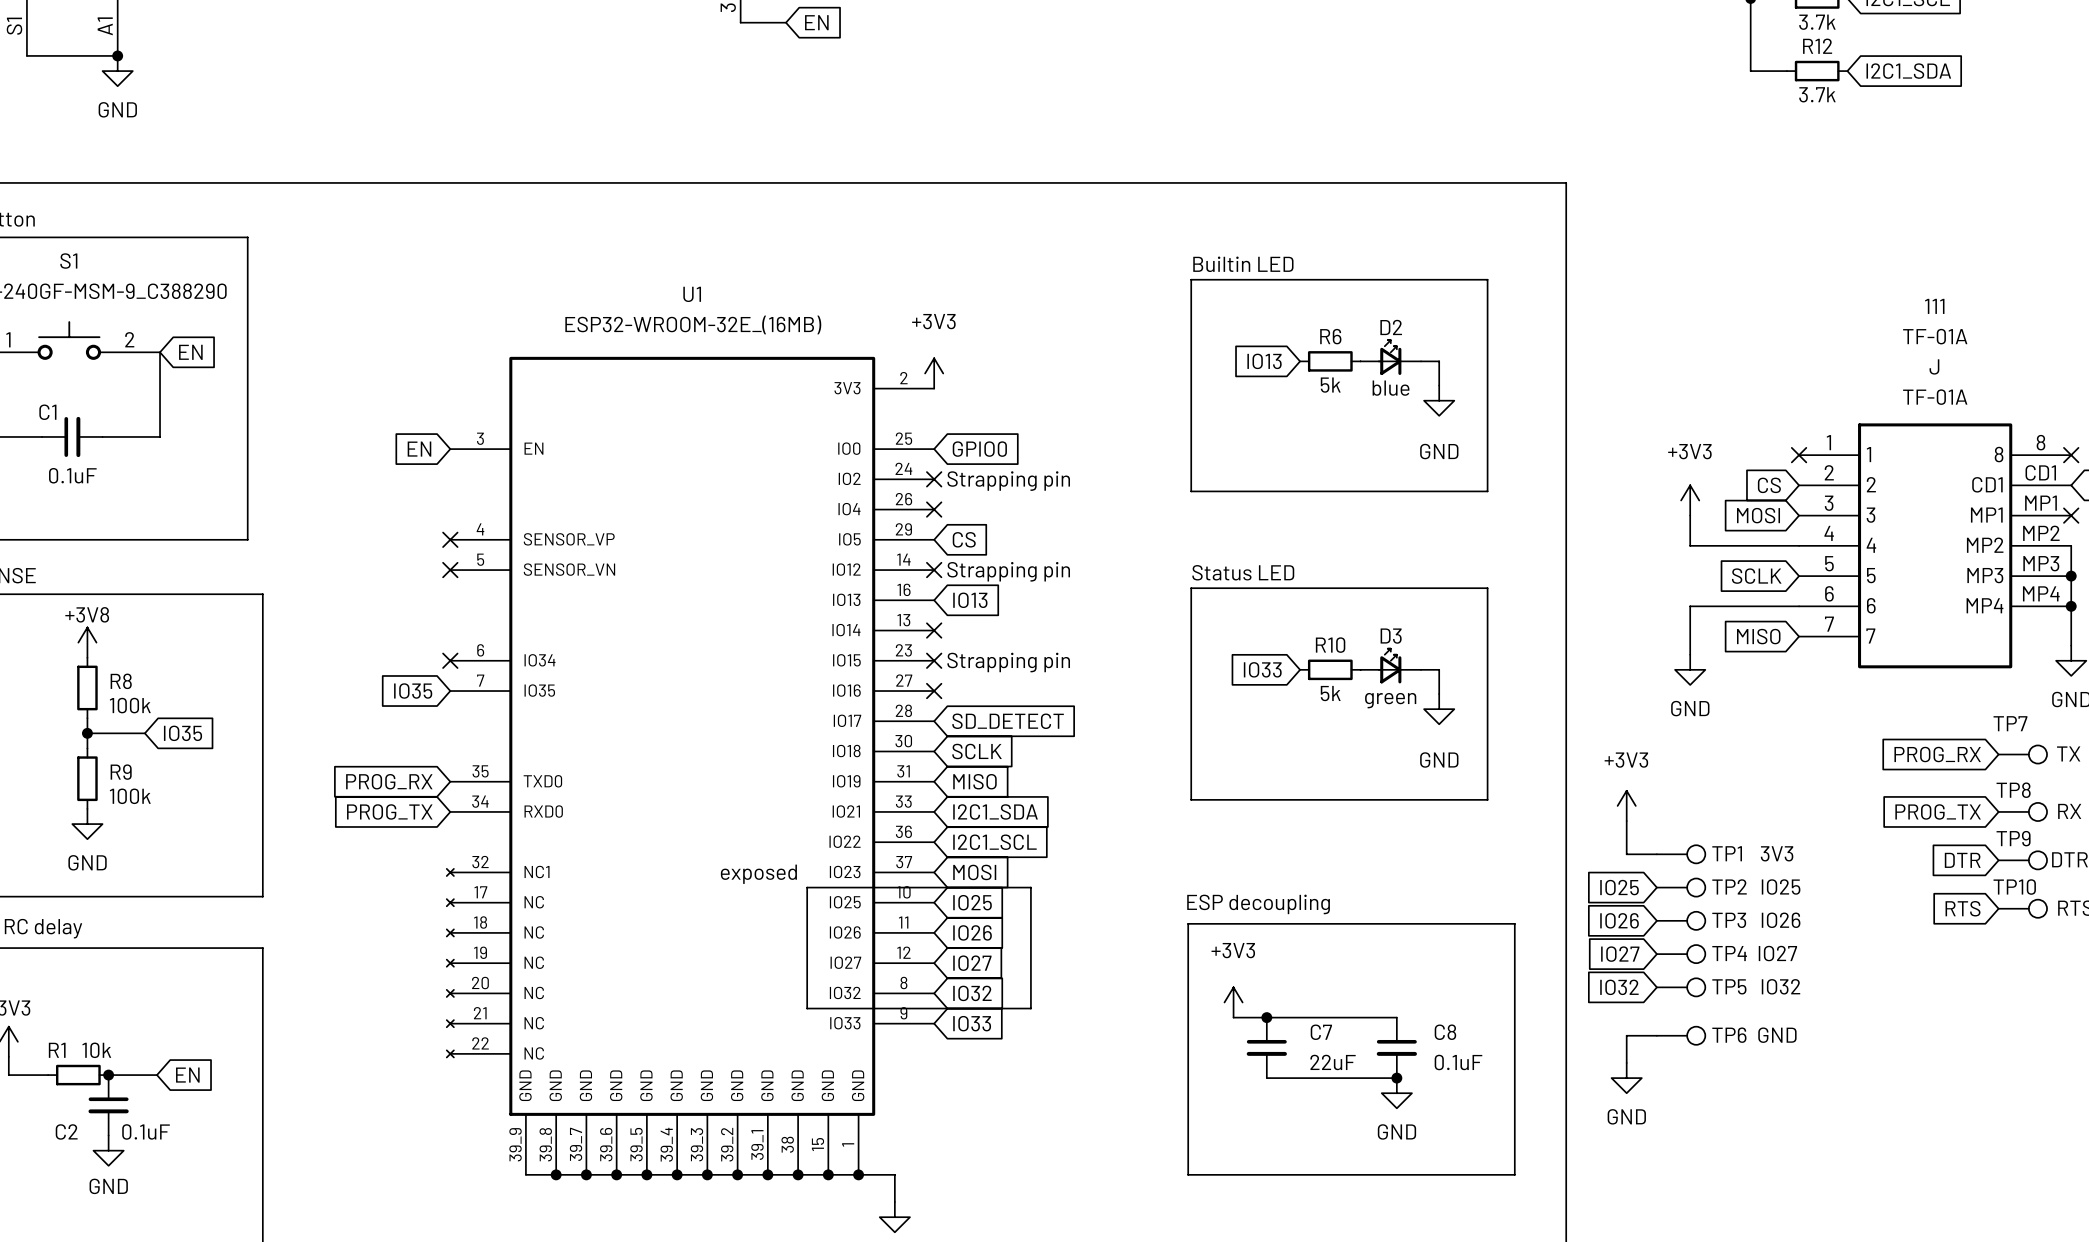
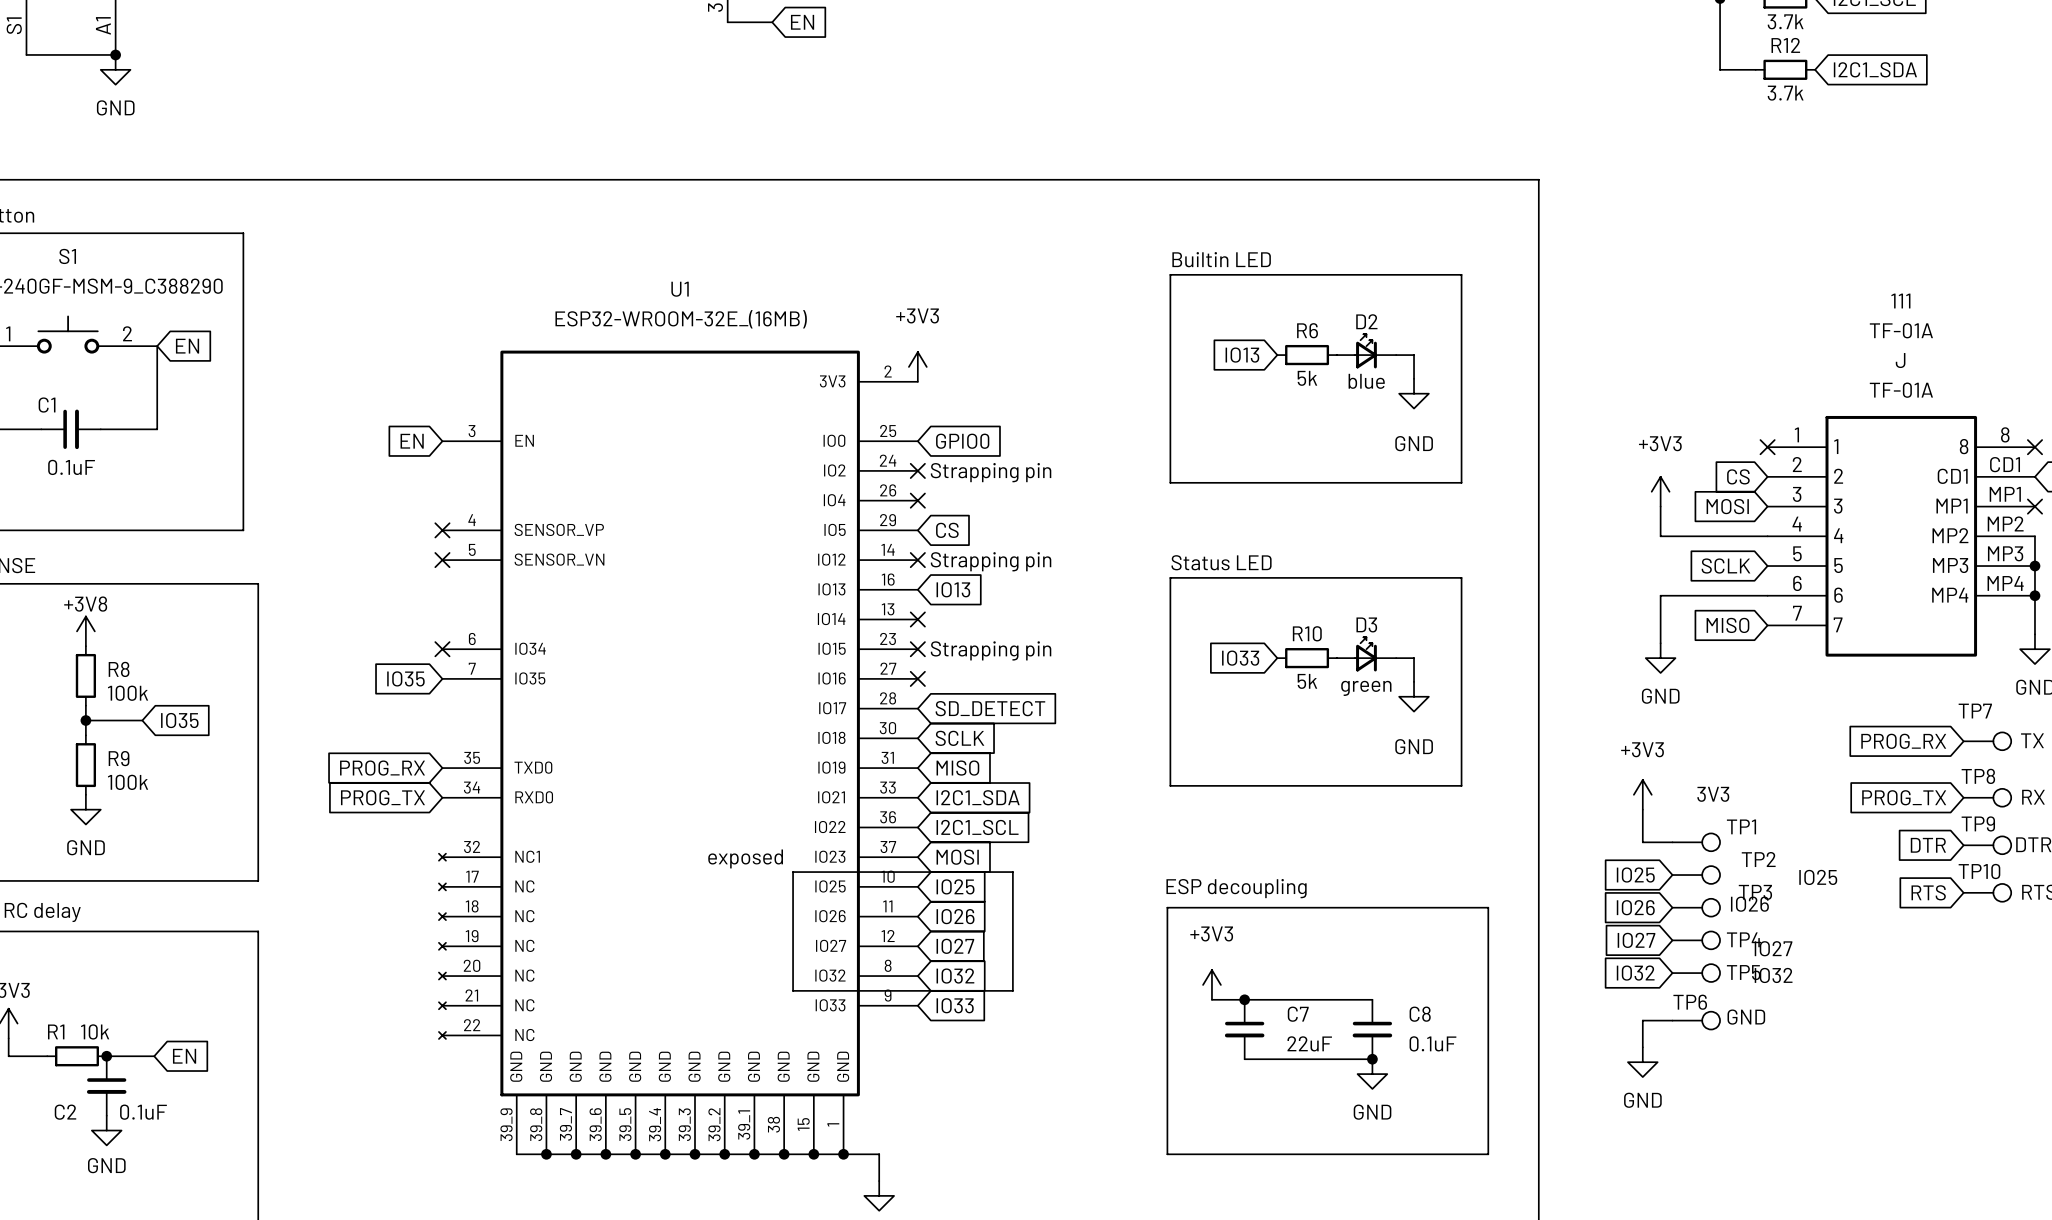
power symbol position: +3V3 (1626, 805) -> +3V3 (1642, 794)
wire: (1626, 821) (1626, 854) (1656, 854) -> (1642, 809) (1642, 842) (1672, 842)
TP1 name position: TP1 (1727, 853) -> TP1 (1741, 826)
TP1 value position: 3V3 (1777, 853) -> 3V3 (1713, 794)
TP1 position: (1681, 854) -> (1696, 842)
TP2 name position: TP2 (1729, 886) -> TP2 (1758, 859)
global label position: IO25 (1619, 887) -> IO25 (1635, 875)
TP2 position: (1681, 887) -> (1696, 875)
TP2 value position: IO25 (1781, 887) -> IO25 (1818, 877)
global label position: IO26 (1619, 920) -> IO26 (1635, 907)
TP3 position: (1681, 920) -> (1696, 907)
TP3 name position: TP3 (1729, 920) -> TP3 (1755, 892)
TP4 value position: IO27 (1777, 953) -> IO27 (1773, 948)
global label position: IO27 (1620, 954) -> IO27 (1636, 940)
TP4 position: (1681, 954) -> (1696, 940)
TP5 value position: IO32 (1781, 986) -> IO32 (1773, 975)
global label position: IO32 (1619, 987) -> IO32 (1635, 973)
TP5 position: (1681, 987) -> (1696, 973)
wire: (1656, 1035) (1626, 1035) (1626, 1062) -> (1672, 1020) (1642, 1020) (1642, 1047)
TP6 position: (1681, 1035) -> (1696, 1020)
TP6 name position: TP6 (1729, 1035) -> TP6 (1690, 1002)
power symbol position: GND (1626, 1078) -> GND (1642, 1062)

